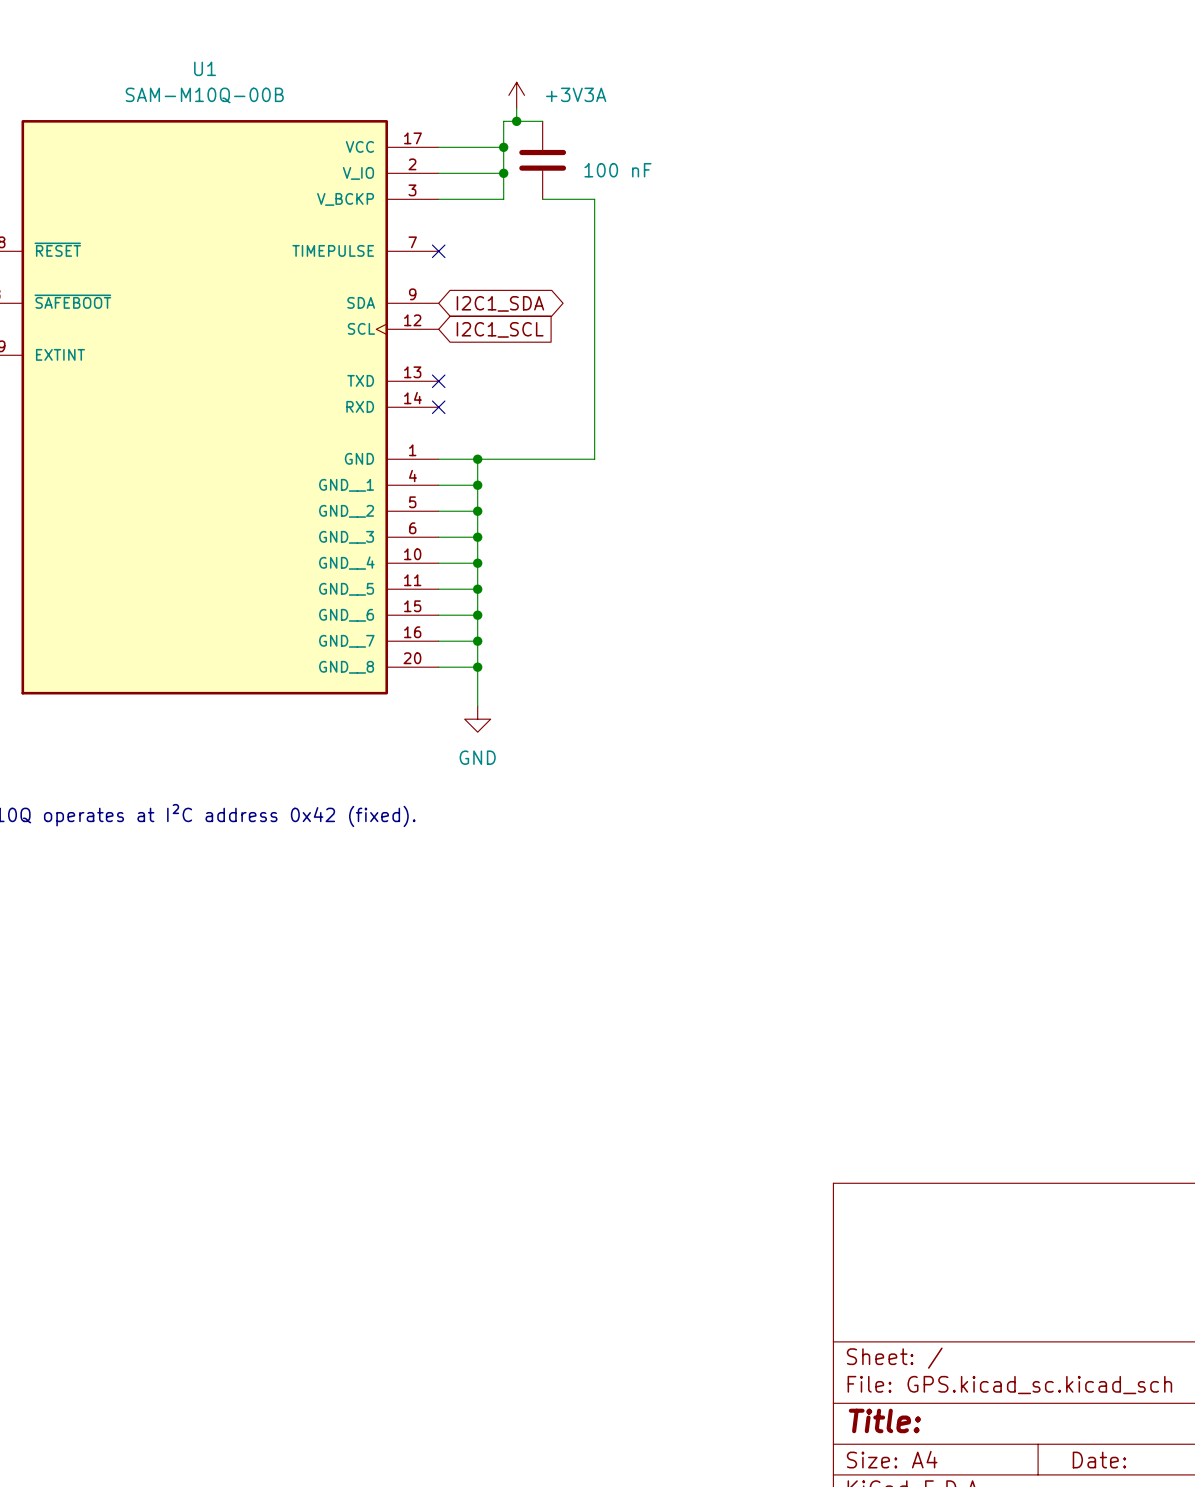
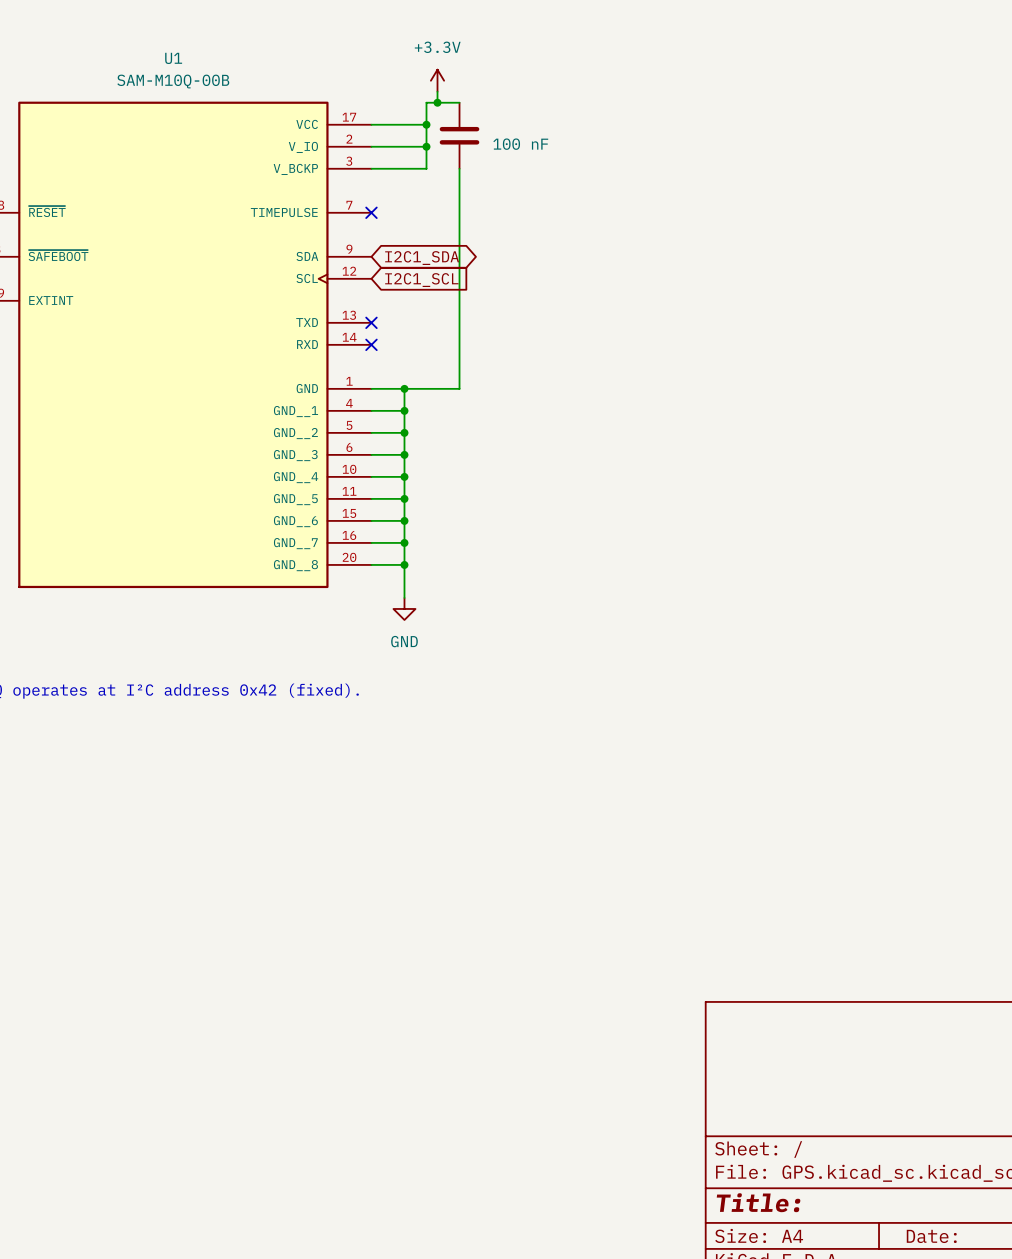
power symbol: +3V3A (516, 95) -> +3.3V (437, 80)
wire: (542, 199) (594, 199) (594, 459) (542, 459) -> (459, 168) (459, 388)

